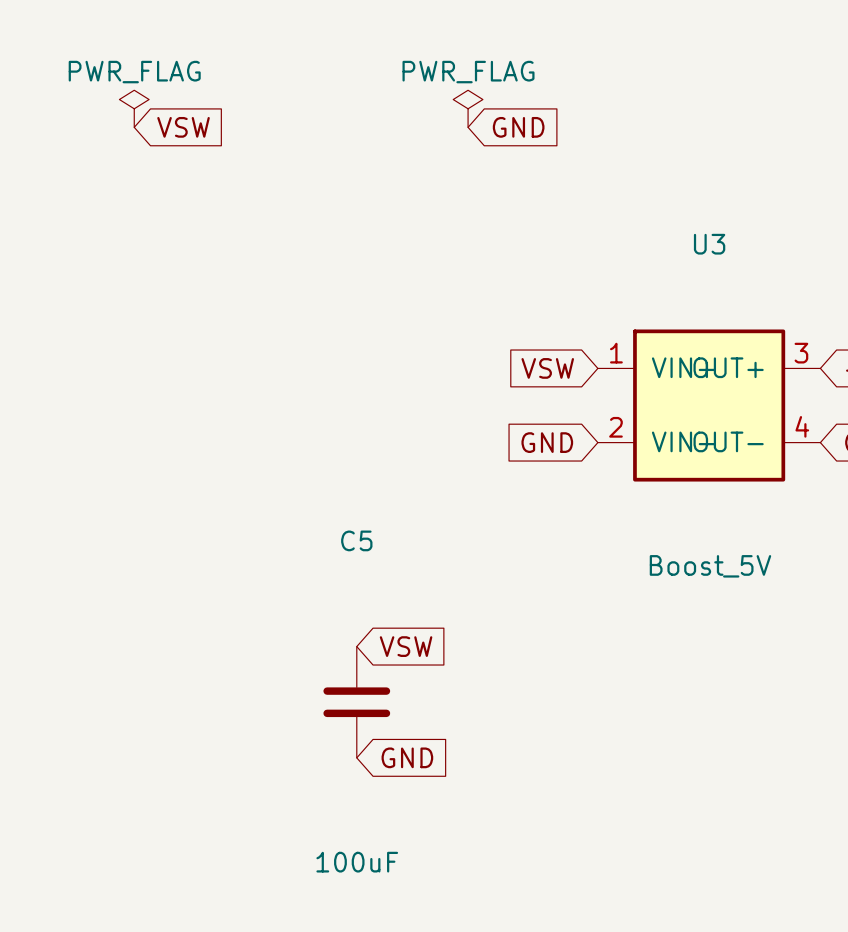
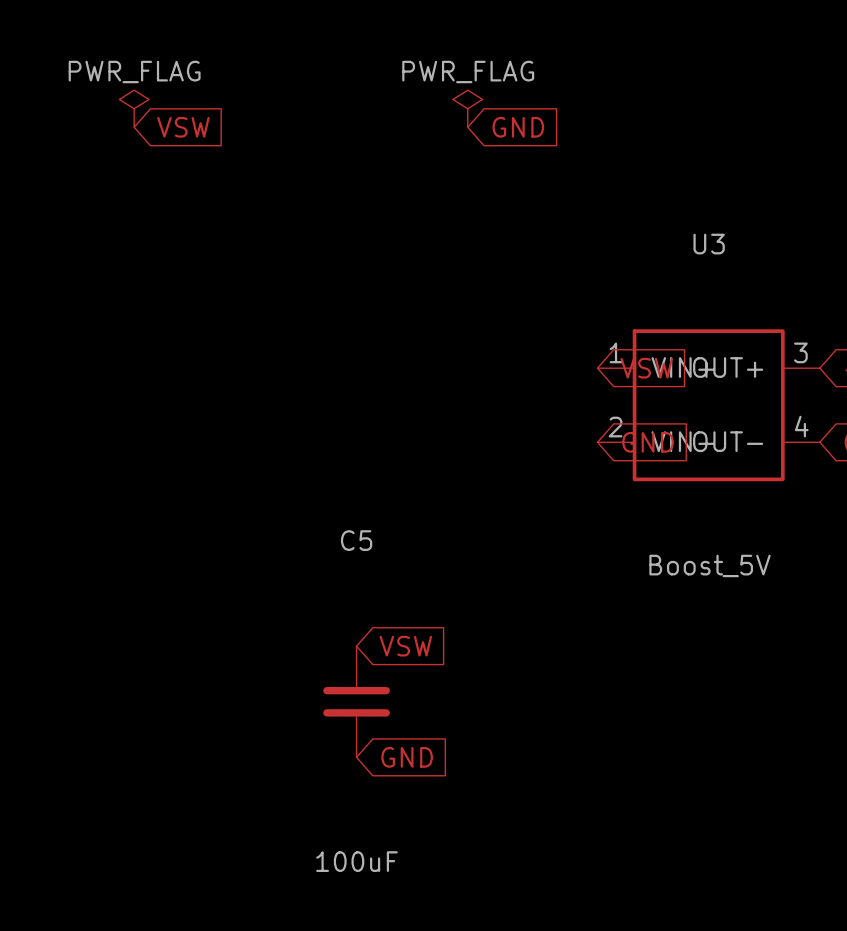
global label rotation: 0° (547, 368) -> 180° (646, 368)
global label rotation: 0° (547, 442) -> 180° (648, 442)

